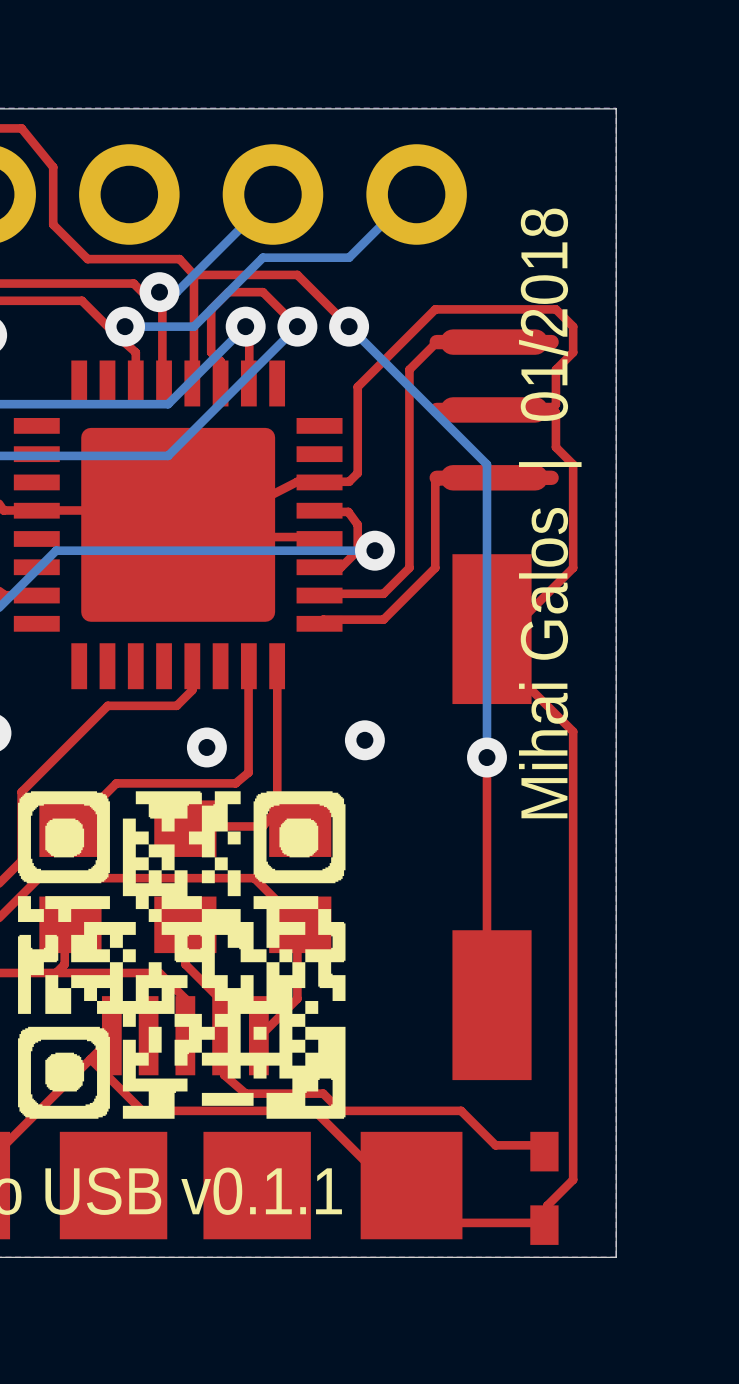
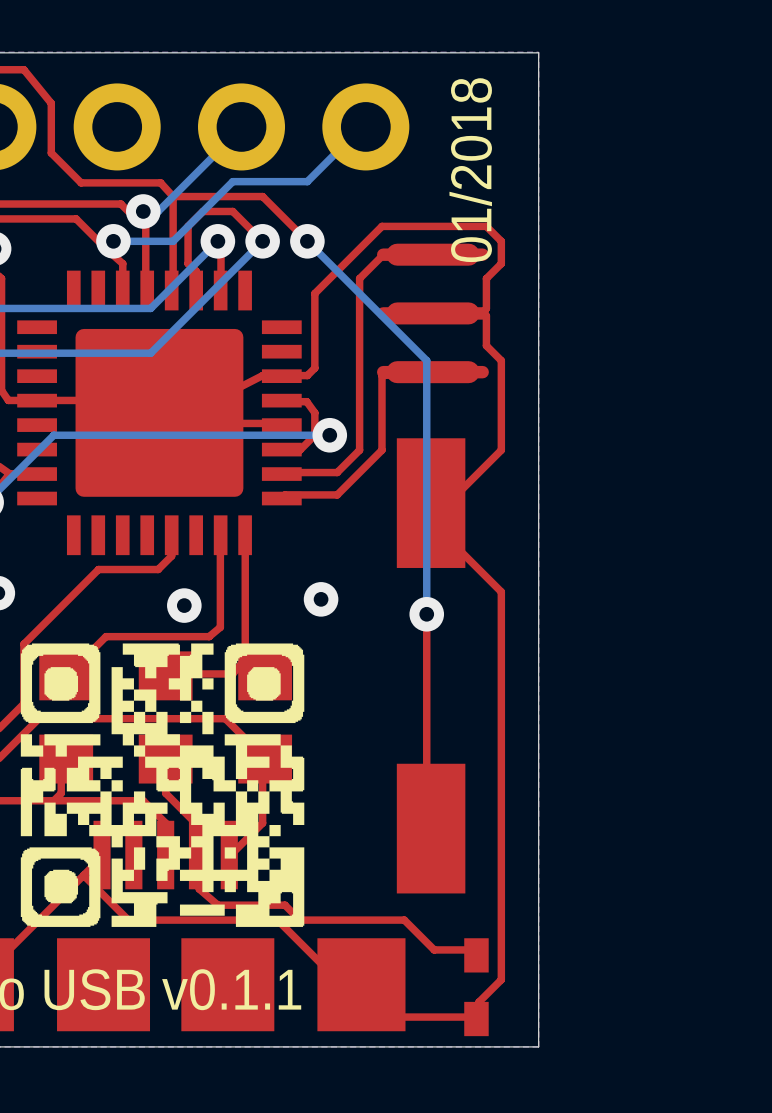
text: none -> 01/2018 (470, 170)
text: Mihai Galos | 01/2018 (550, 513) -> none

